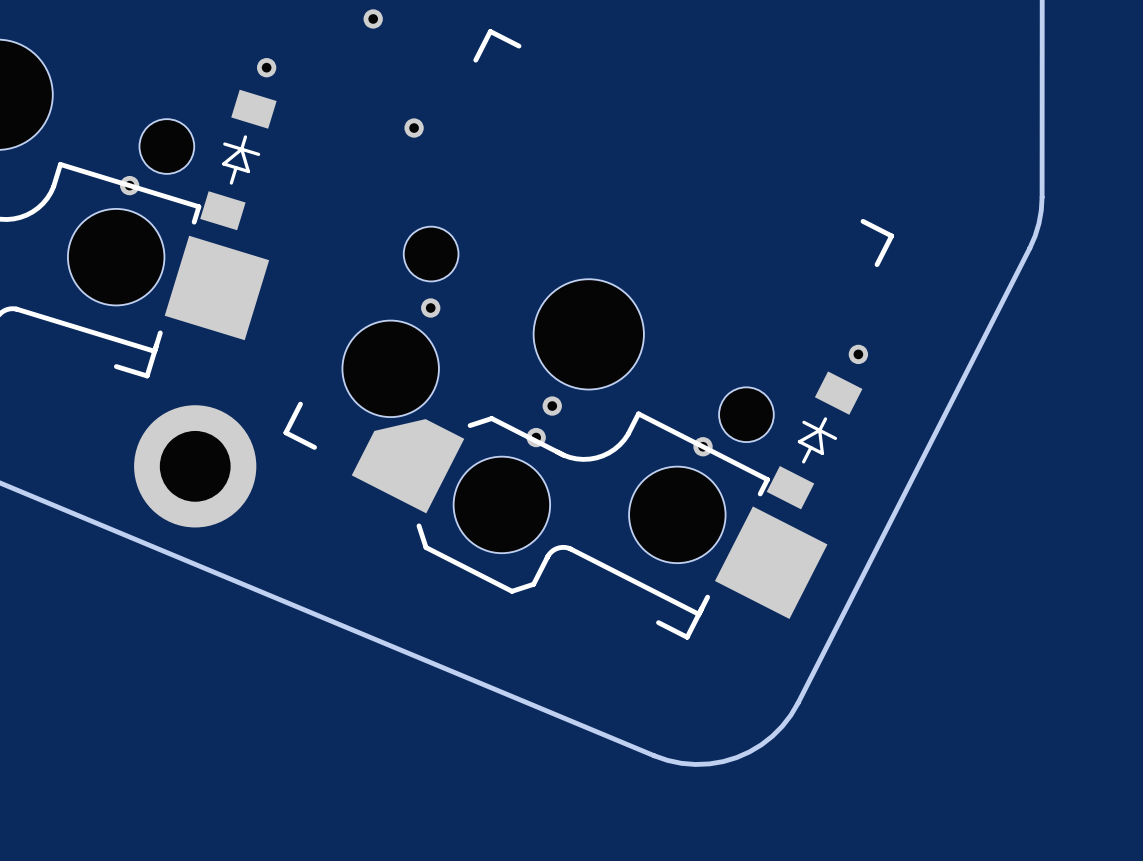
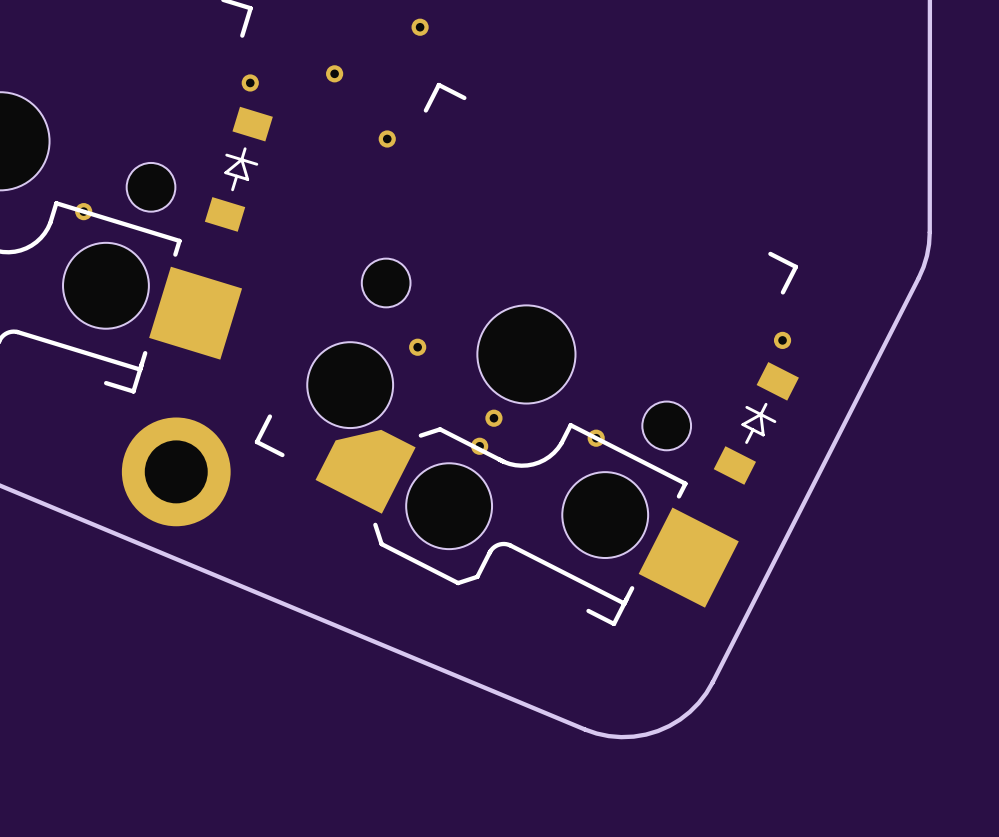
part position: (266, 67) -> (250, 82)
part position: (414, 128) -> (387, 138)
part position: (238, 159) -> (238, 169)
part position: (129, 185) -> (83, 211)
part position: (430, 308) -> (417, 347)
part position: (858, 354) -> (782, 340)
part position: (814, 440) -> (756, 423)
part position: (703, 446) -> (596, 438)

